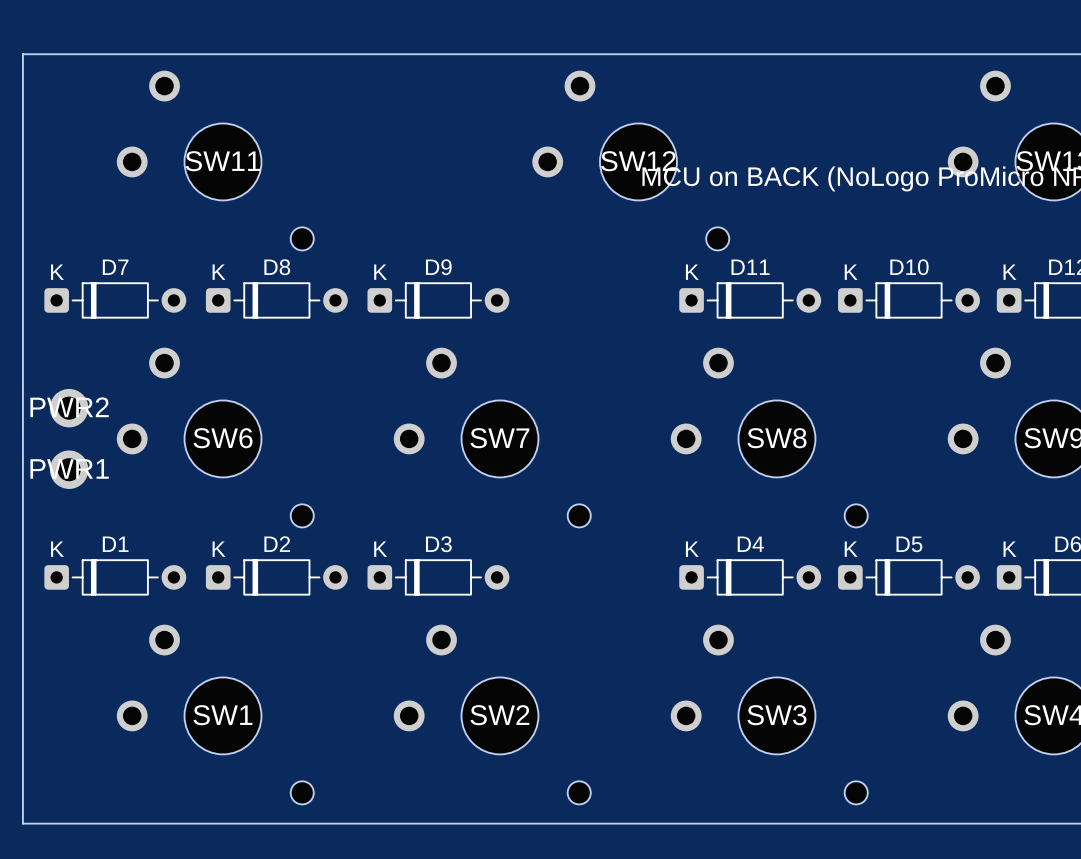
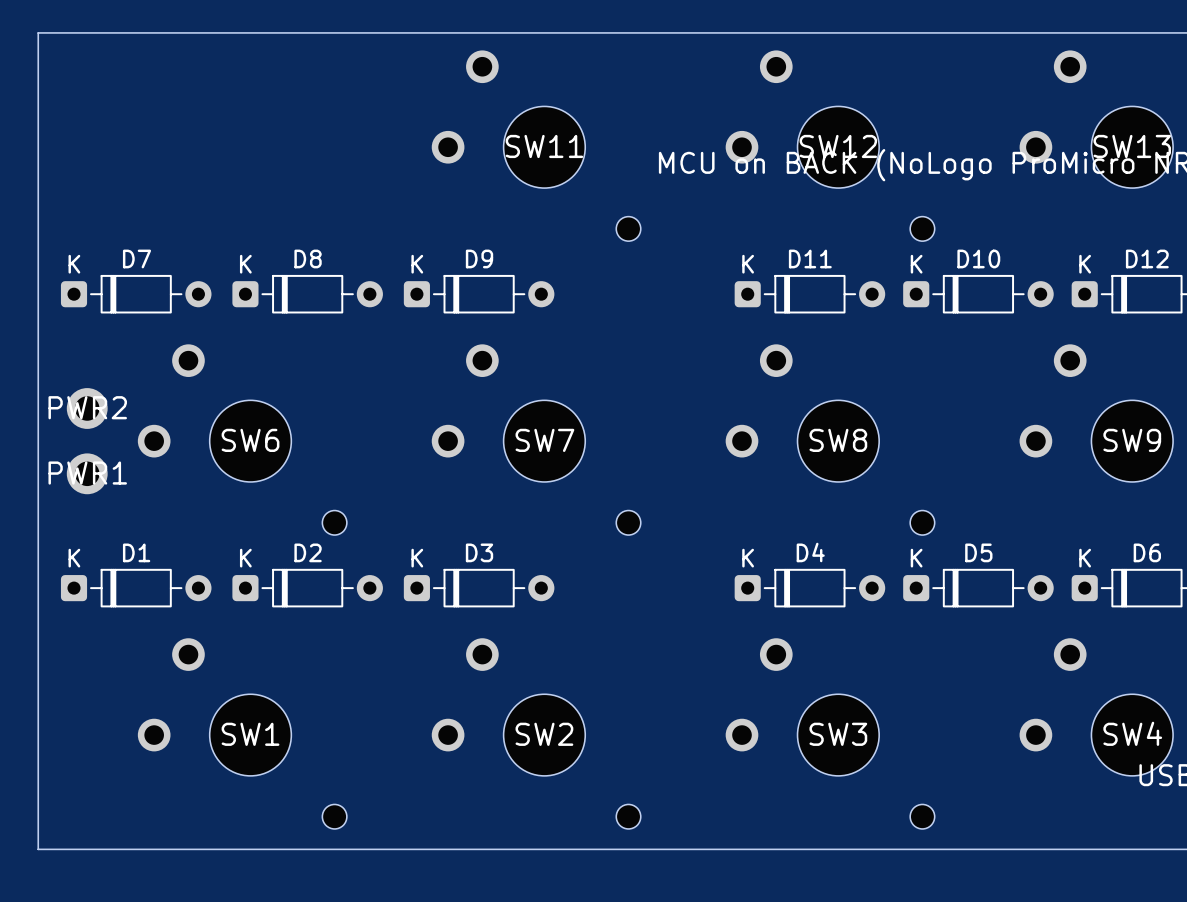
SW11 position: (215, 160) -> (536, 145)
SW12 position: (630, 160) -> (830, 145)

